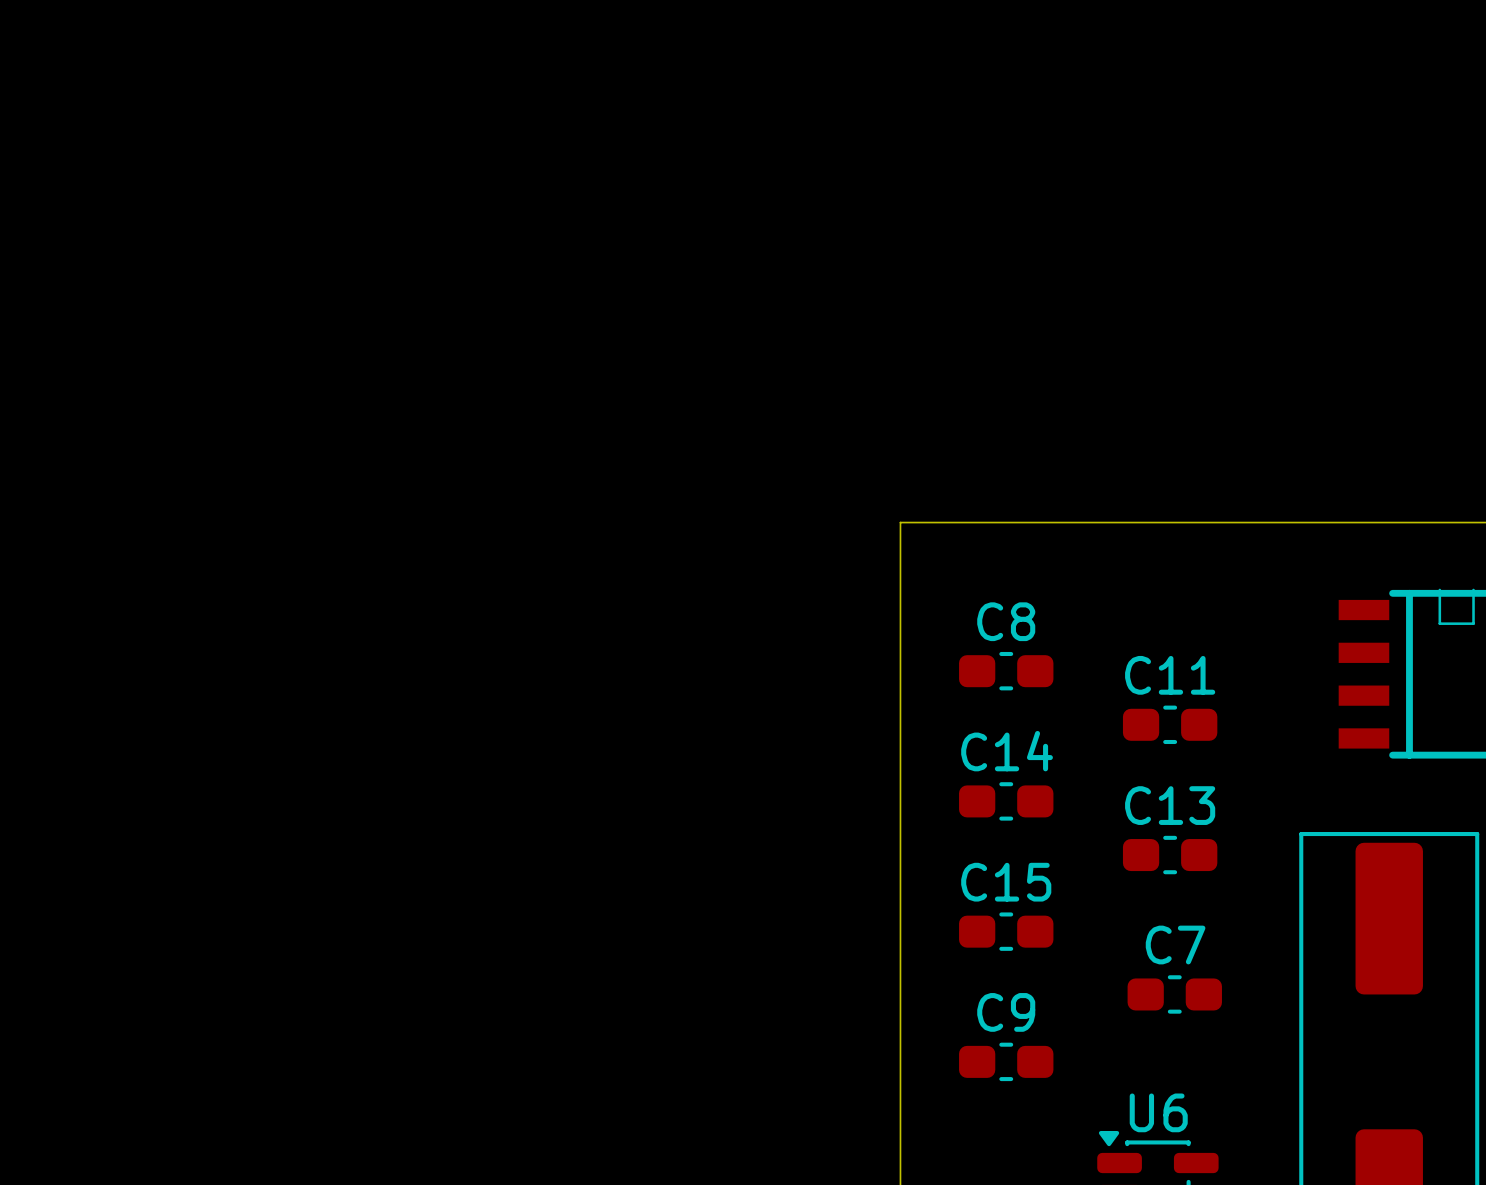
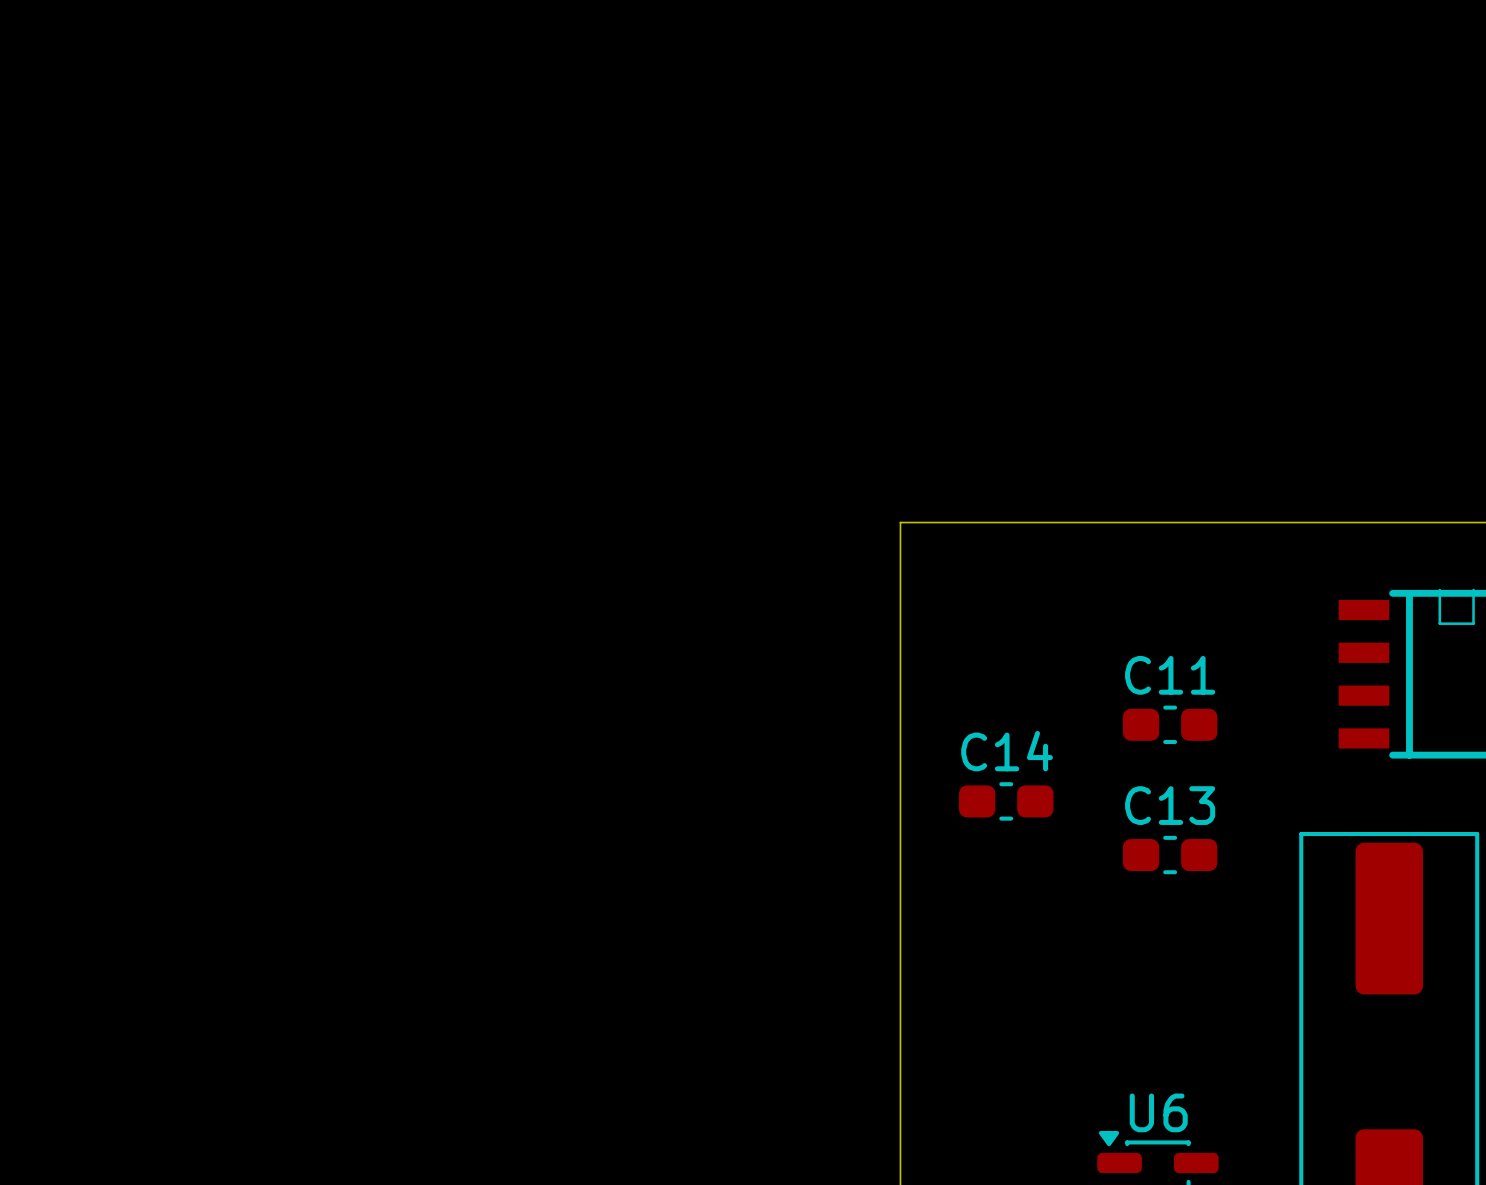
C8: (1006, 671) -> none
C15: (1006, 931) -> none
C7: (1174, 994) -> none
C9: (1006, 1061) -> none

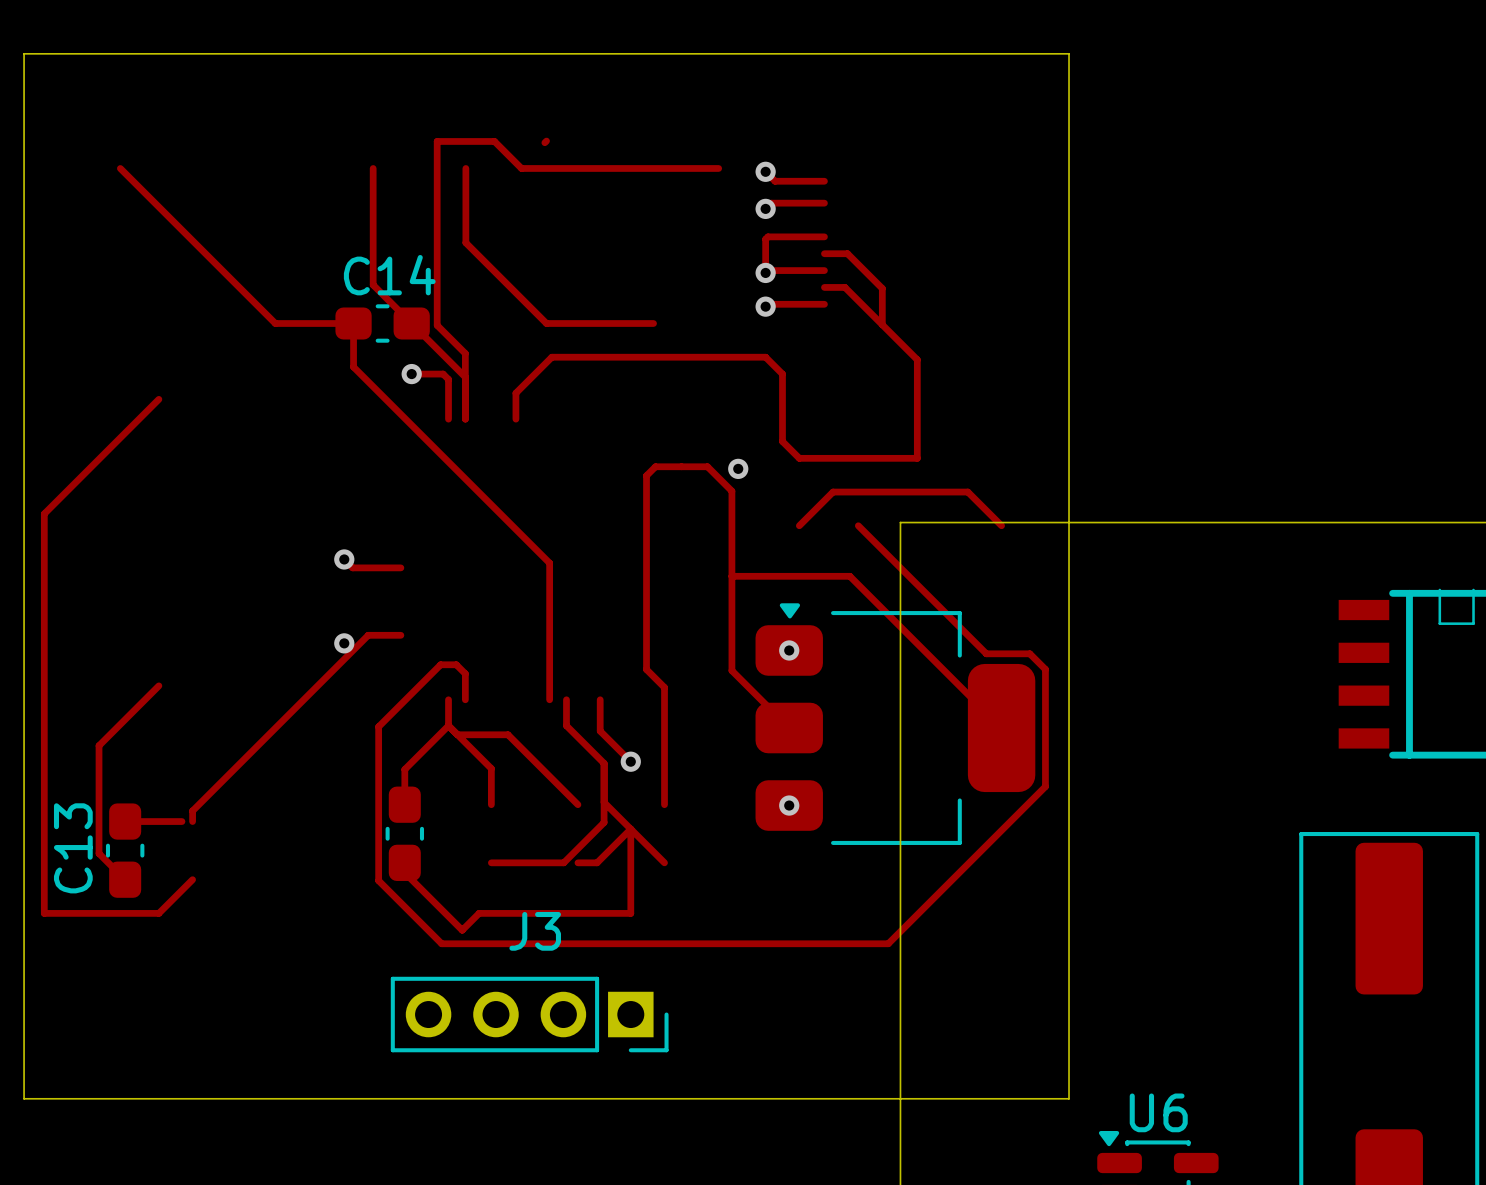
board edge: none -> (24, 53) (1069, 53) (1069, 1098) (24, 1098) (24, 53)
track: none -> (546, 141) (544, 142)
track: none -> (120, 168) (275, 323) (353, 323) (353, 367) (549, 563) (549, 699)
track: none -> (373, 168) (373, 284) (465, 377)
track: none -> (465, 168) (465, 242) (546, 323) (653, 323)
track: none -> (718, 168) (521, 168) (494, 141) (437, 141) (437, 325) (465, 353) (465, 419)
track: none -> (765, 171) (775, 181) (824, 181)
via: none -> (765, 171)
track: none -> (824, 203) (771, 203) (765, 208)
via: none -> (765, 208)
track: none -> (824, 236) (768, 236) (765, 239) (765, 272) (768, 270) (824, 270)
track: none -> (824, 253) (847, 253) (882, 288) (882, 324)
via: none -> (765, 272)
track: none -> (824, 287) (844, 287) (917, 359) (917, 458) (799, 458) (782, 441) (782, 374) (765, 357) (551, 357) (515, 393) (515, 419)
track: none -> (824, 304) (768, 304) (765, 306)
via: none -> (765, 306)
track: none -> (411, 374) (443, 374) (448, 379) (448, 419)
via: none -> (411, 374)
track: none -> (158, 399) (44, 513) (44, 913) (158, 913) (192, 879)
via: none -> (738, 468)
track: none -> (799, 525) (833, 492) (967, 492) (1001, 525)
track: none -> (858, 525) (986, 653) (1029, 653) (1045, 669) (1045, 786) (888, 943) (441, 943) (378, 880) (378, 726) (440, 664) (456, 664) (465, 673) (465, 699)
track: none -> (344, 559) (352, 567) (400, 567)
via: none -> (344, 559)
track: none -> (731, 576) (849, 576) (1001, 728)
track: none -> (400, 635) (368, 635) (192, 810) (192, 821)
via: none -> (344, 643)
via: none -> (789, 650)
track: none -> (158, 685) (99, 745) (99, 853) (125, 879)
track: none -> (448, 699) (448, 725)
track: none -> (566, 699) (566, 725) (604, 763) (604, 822) (563, 862) (491, 862)
track: none -> (600, 699) (600, 731) (630, 761)
part: none -> (895, 724)
C11: (1170, 724) -> none
track: none -> (448, 725) (491, 768) (491, 804)
track: none -> (448, 725) (404, 769) (404, 804)
track: none -> (789, 728) (731, 670) (731, 491) (707, 466) (655, 466) (646, 475) (646, 669) (664, 687) (664, 804)
track: none -> (457, 734) (508, 734) (577, 804)
C14 name position: C14 (1007, 751) -> C14 (389, 275)
via: none -> (630, 761)
C14 position: (1006, 801) -> (382, 323)
track: none -> (604, 802) (664, 862)
via: none -> (789, 805)
C13 name position: C13 (1170, 805) -> C13 (73, 848)
track: none -> (125, 821) (182, 821)
part: none -> (404, 833)
C13 rotation: 0° (1170, 855) -> 90° clockwise (125, 850)
C13 position: (1170, 855) -> (125, 850)
track: none -> (404, 862) (404, 872) (462, 930) (479, 913) (630, 913) (630, 829) (597, 862) (577, 862)
J3: none -> (529, 1014)

